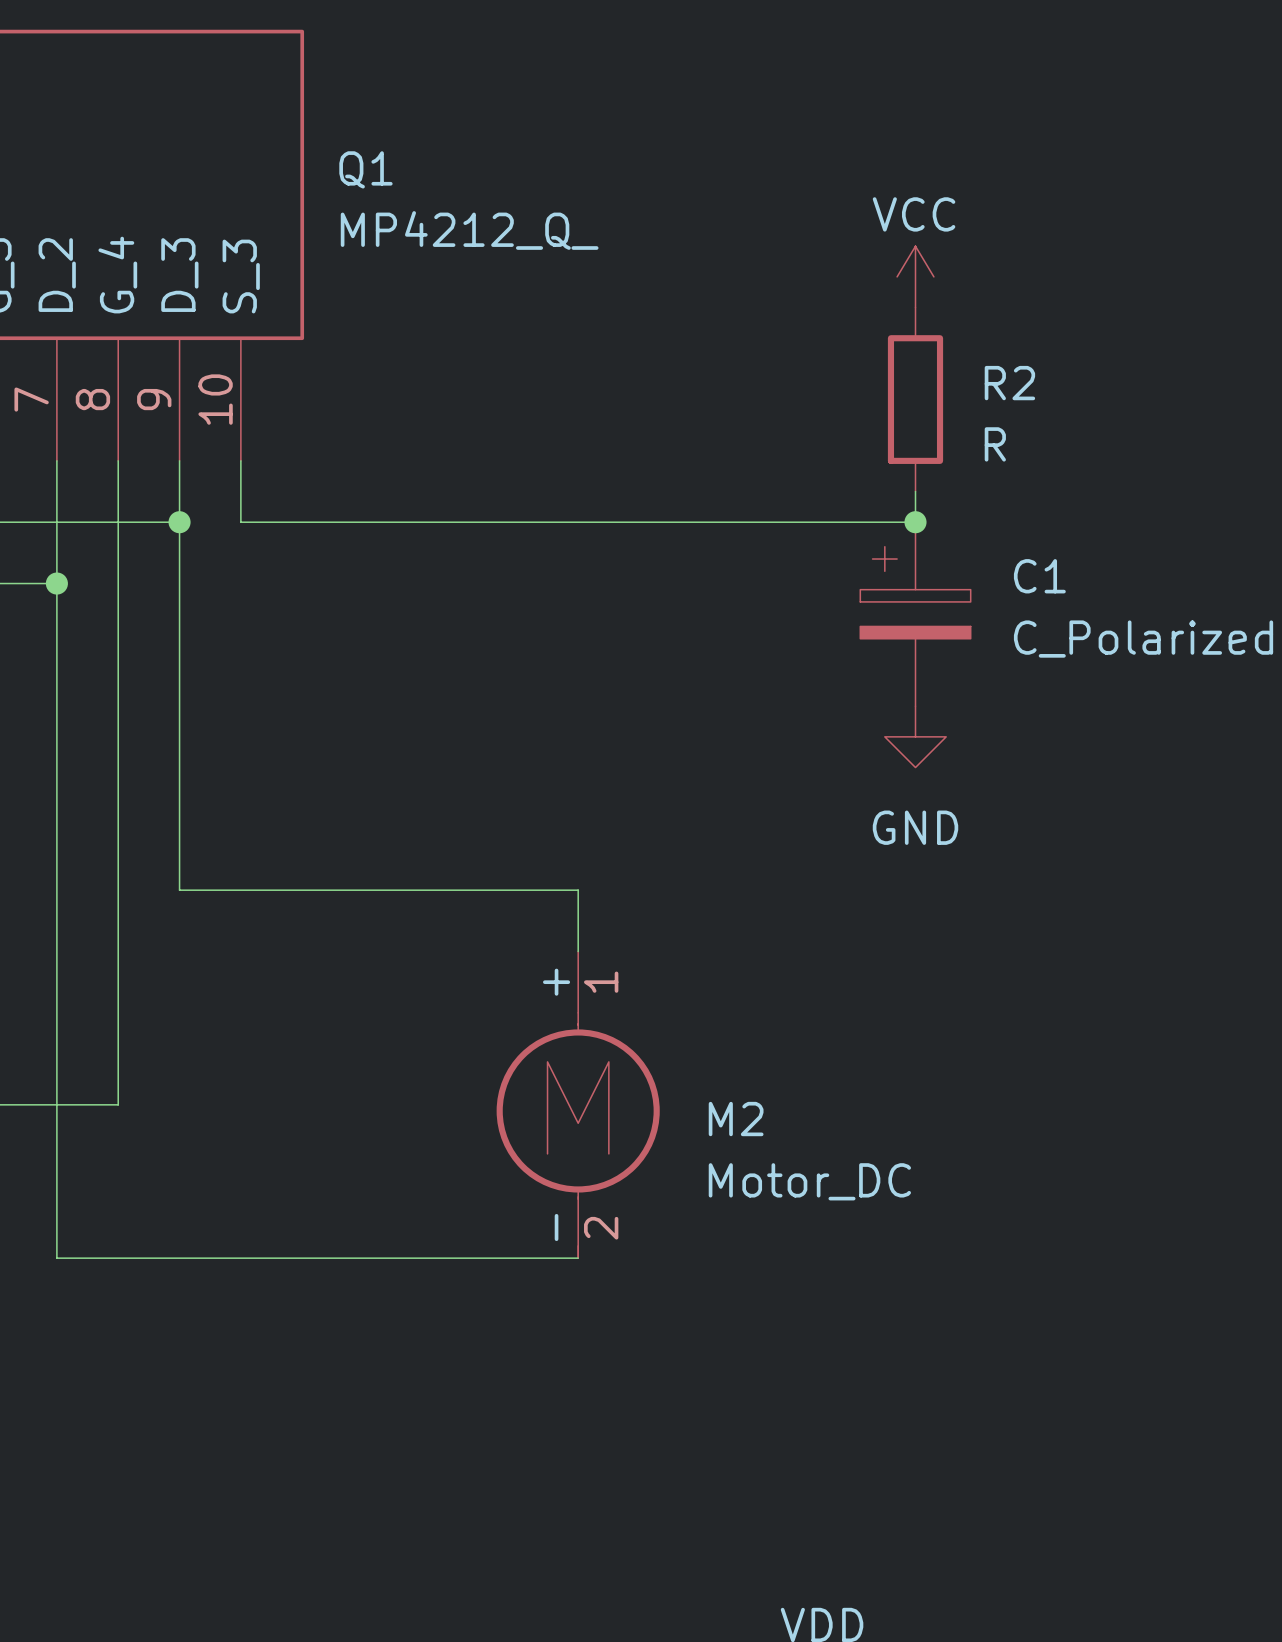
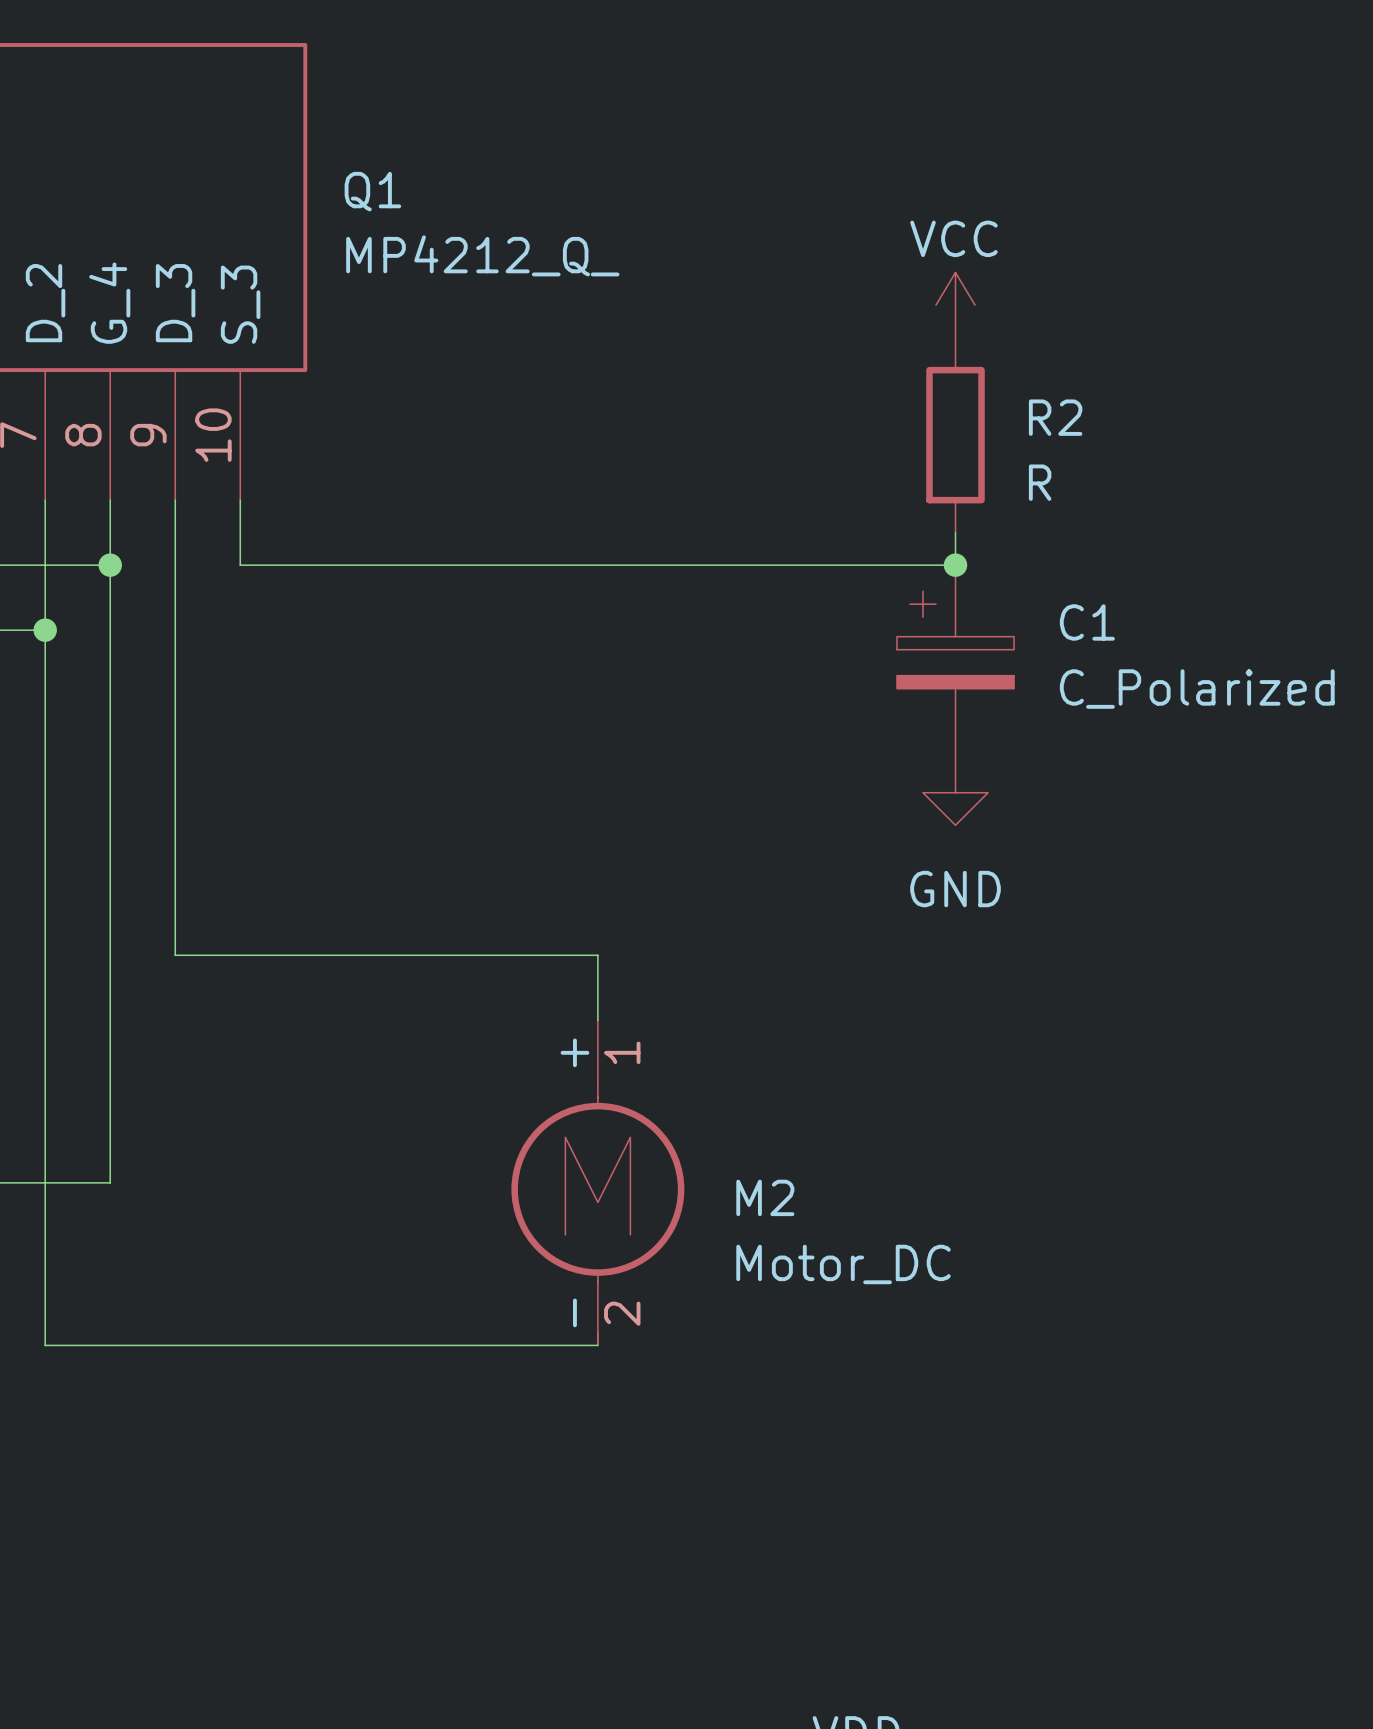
wire: (118, 522) (179, 522) -> none
junction position: (179, 522) -> (110, 565)

